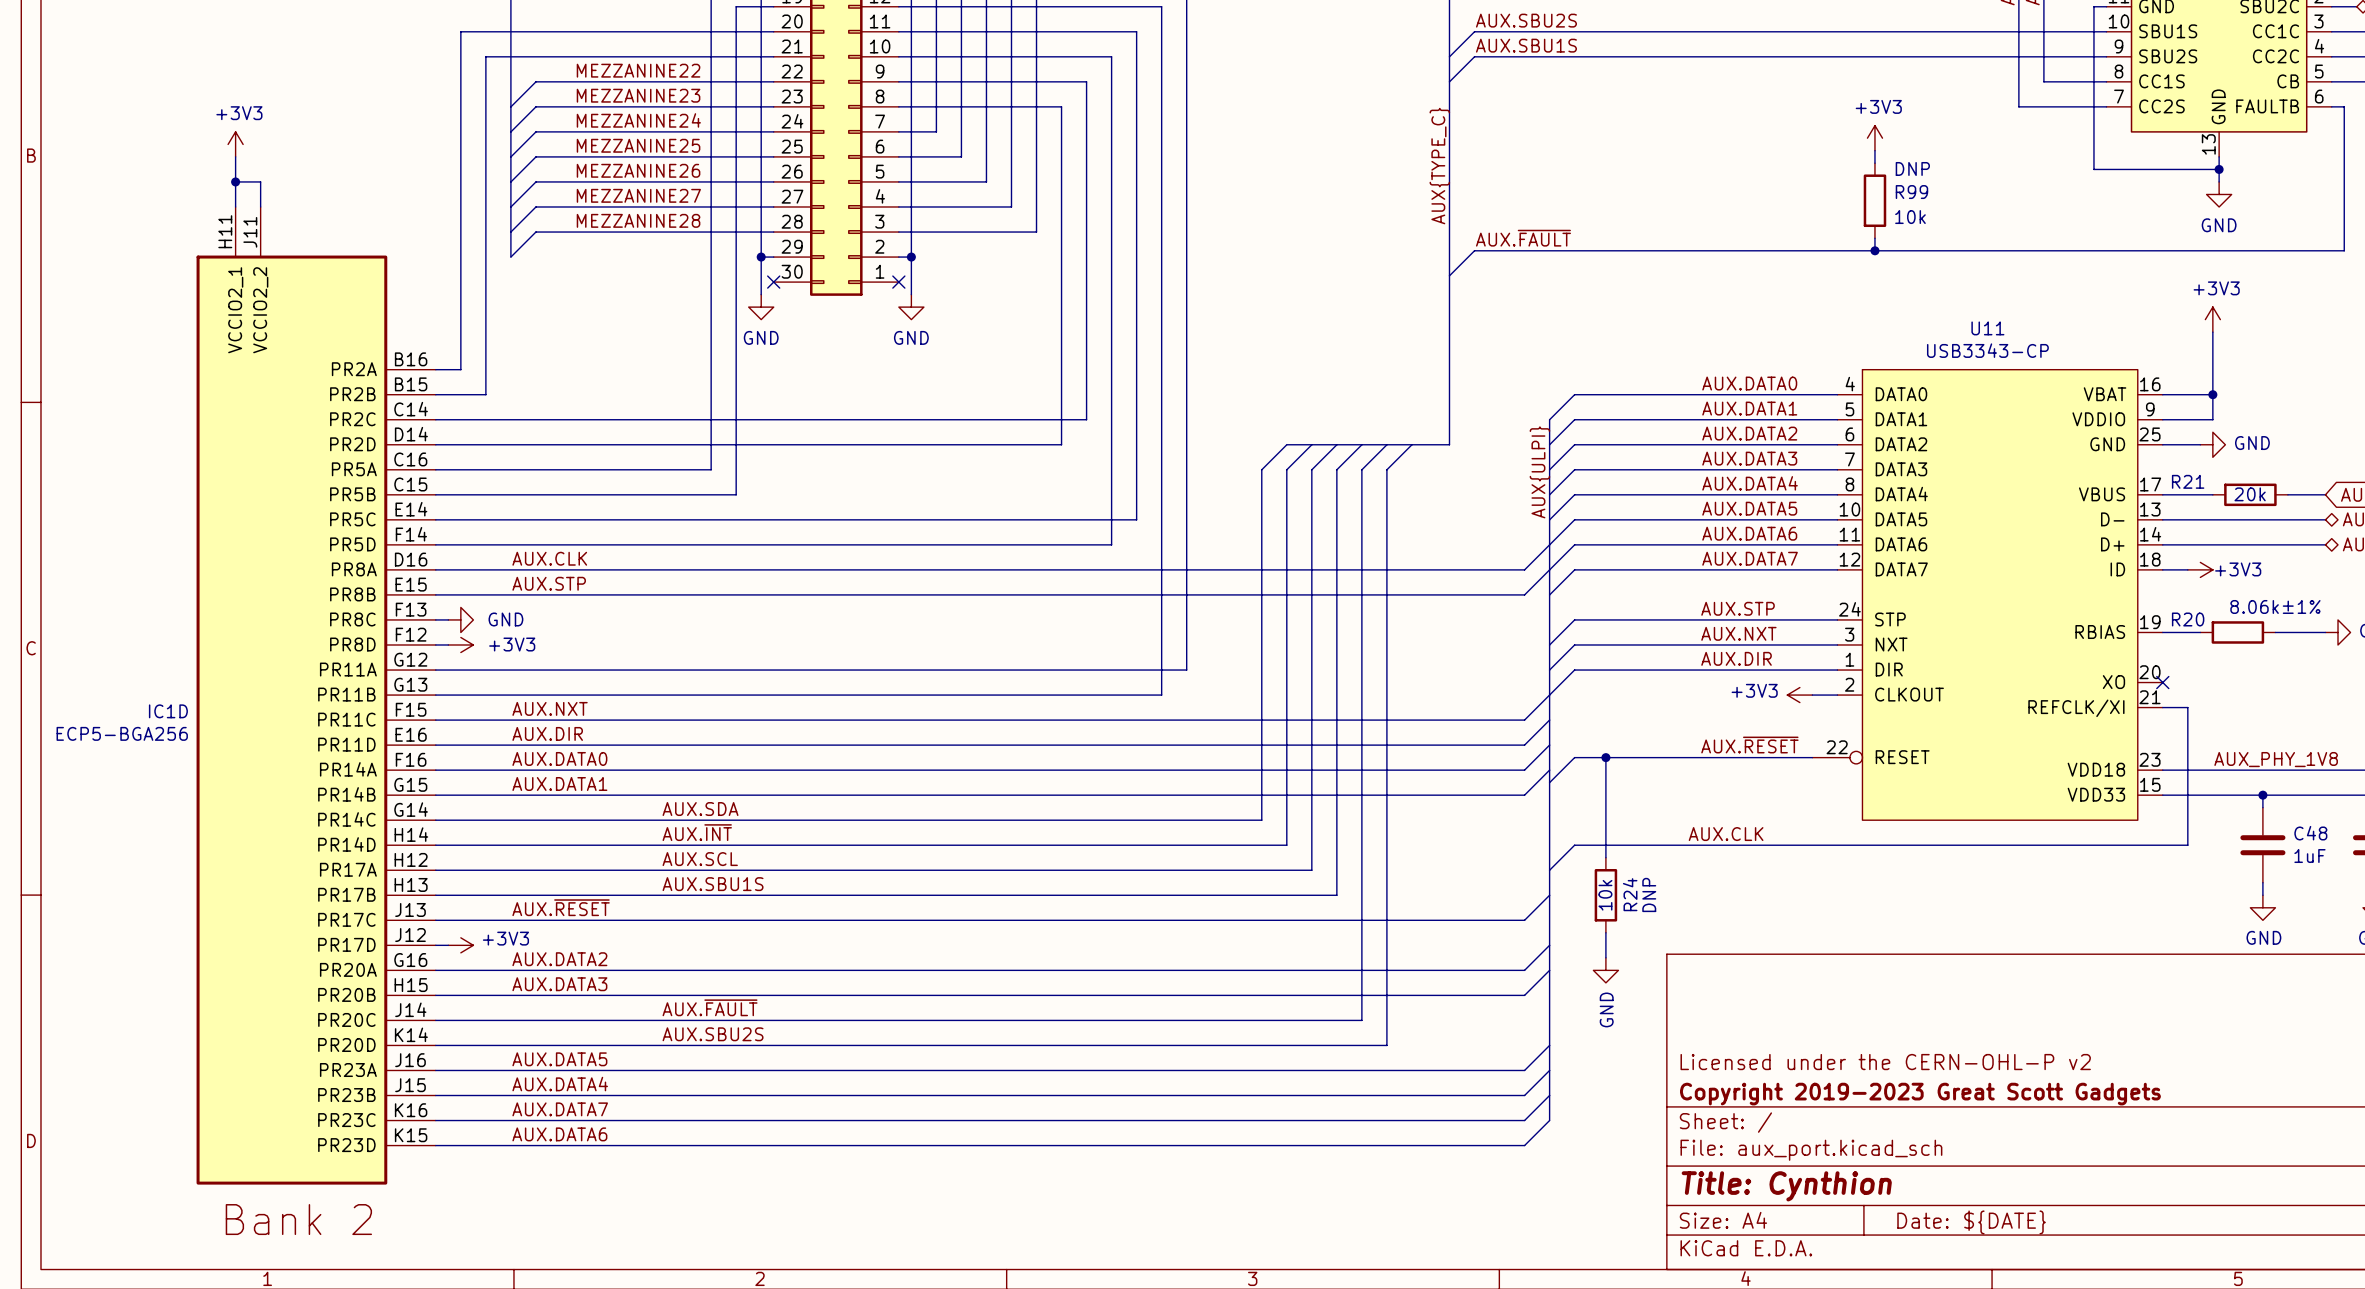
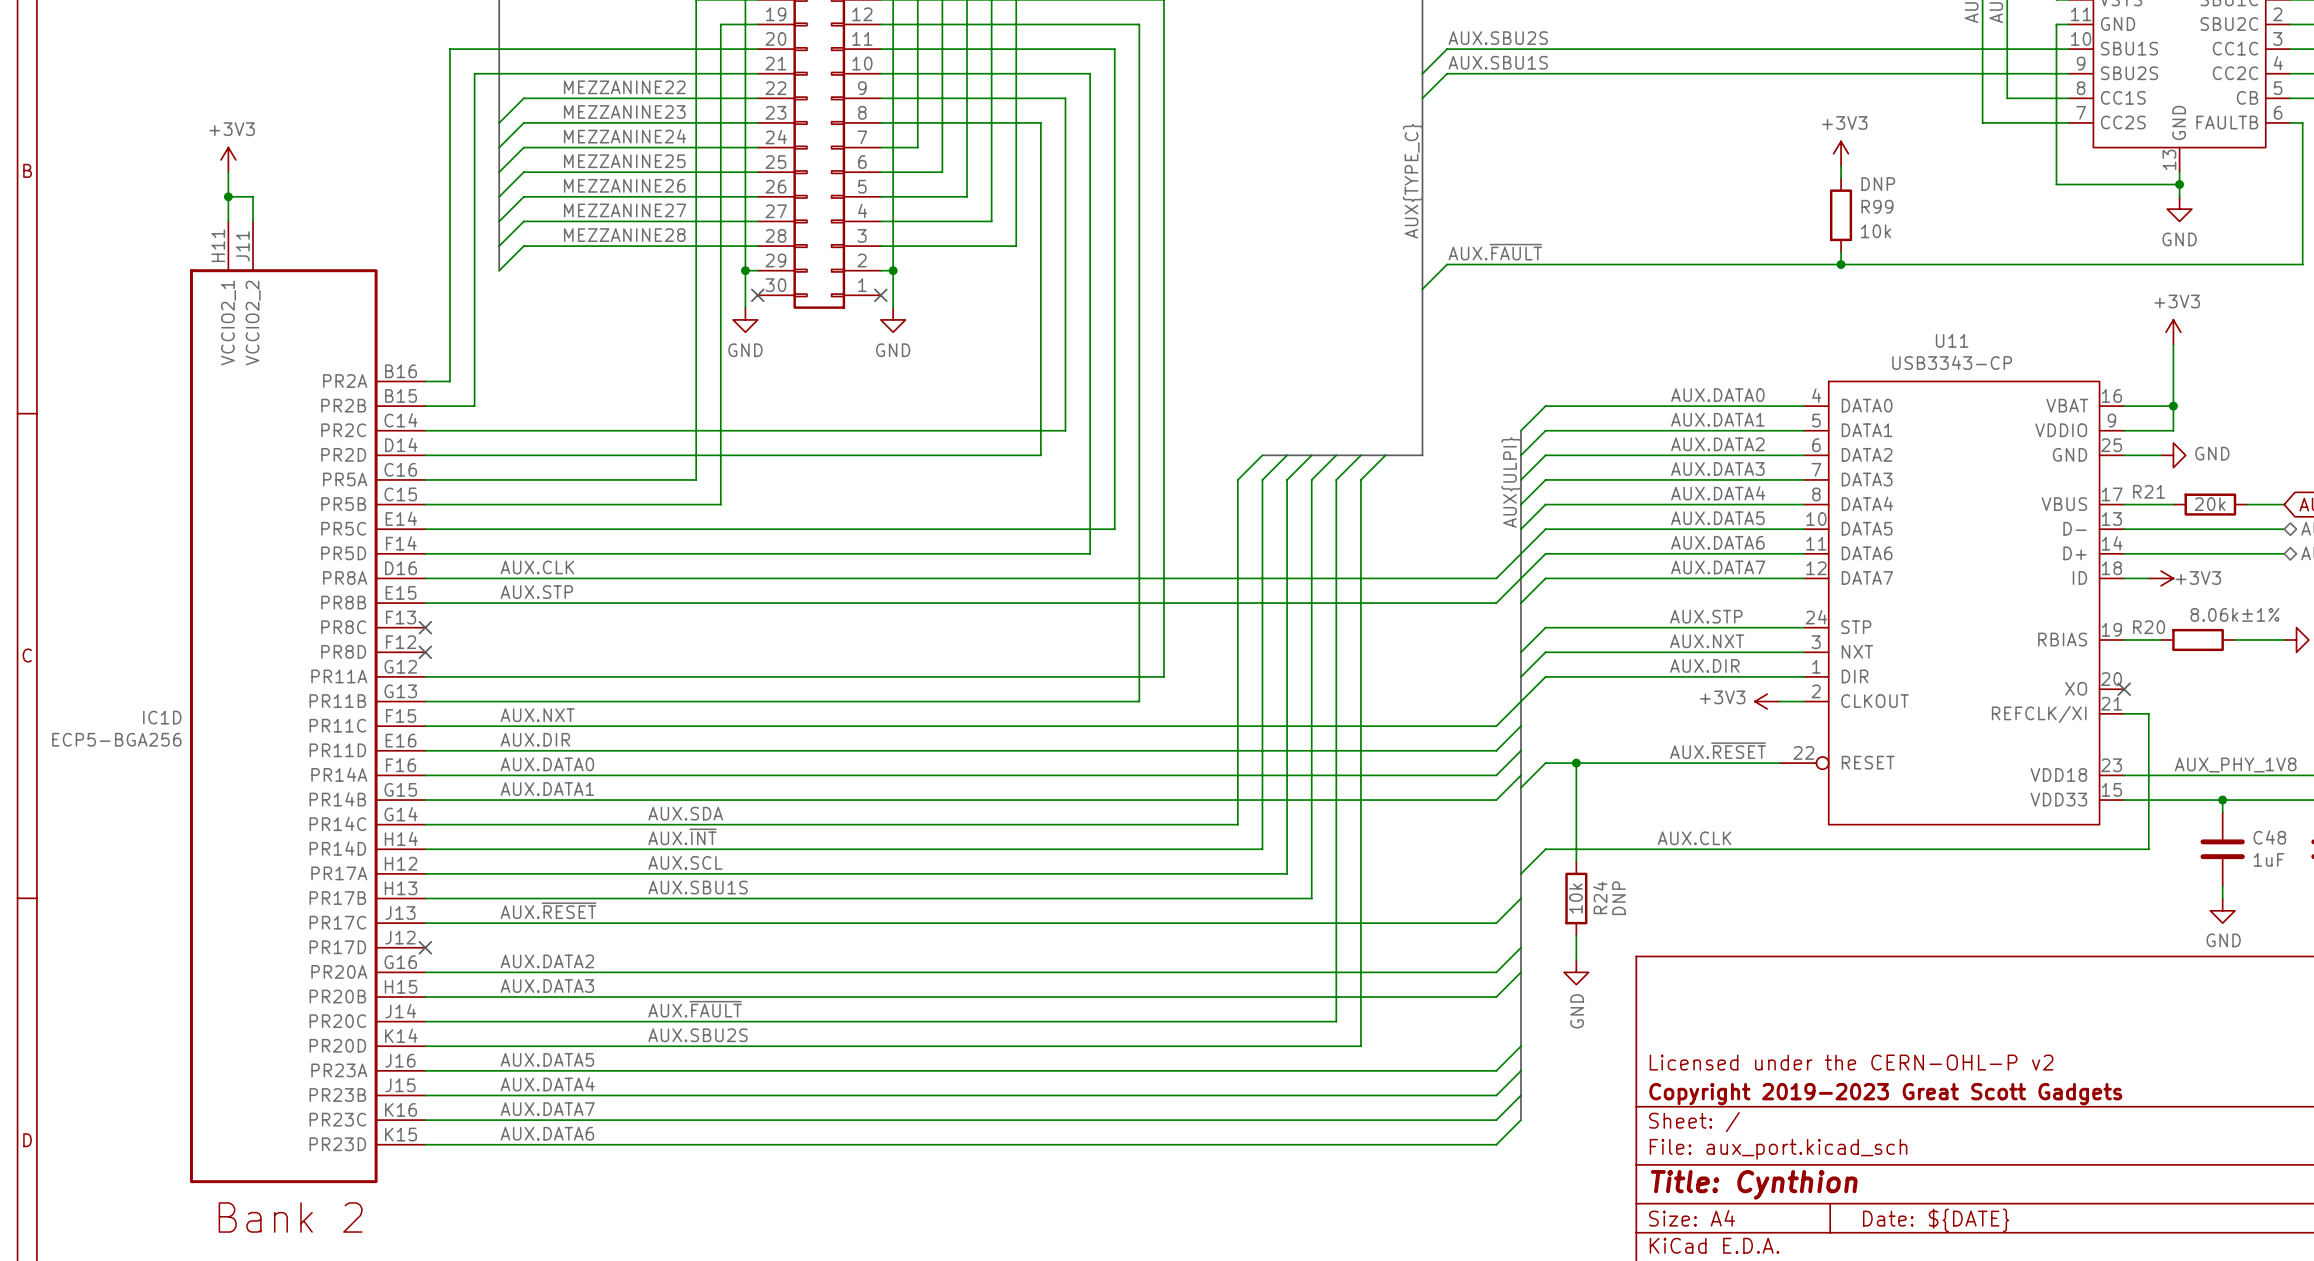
wire: (435, 619) (448, 619) -> none
no-connect mark: none -> (425, 627)
power symbol: GND (460, 619) -> none
wire: (435, 644) (448, 644) -> none
no-connect mark: none -> (425, 652)
power symbol: +3V3 (460, 644) -> none
wire: (435, 945) (448, 945) -> none
no-connect mark: none -> (425, 947)
power symbol: +3V3 (460, 945) -> none

